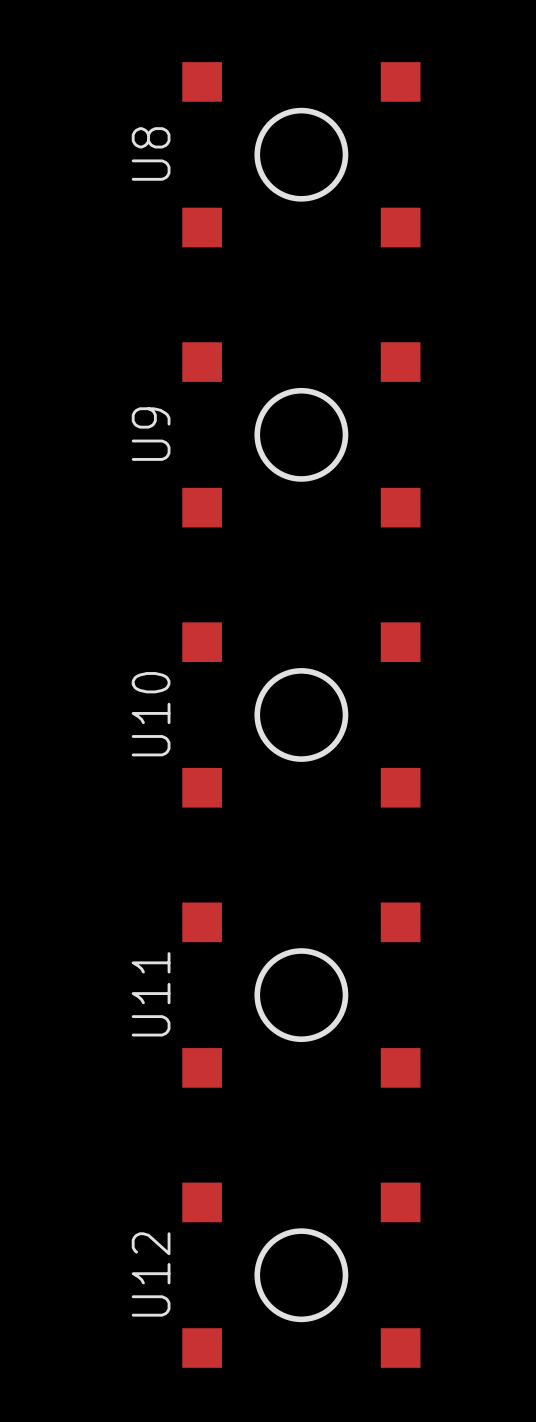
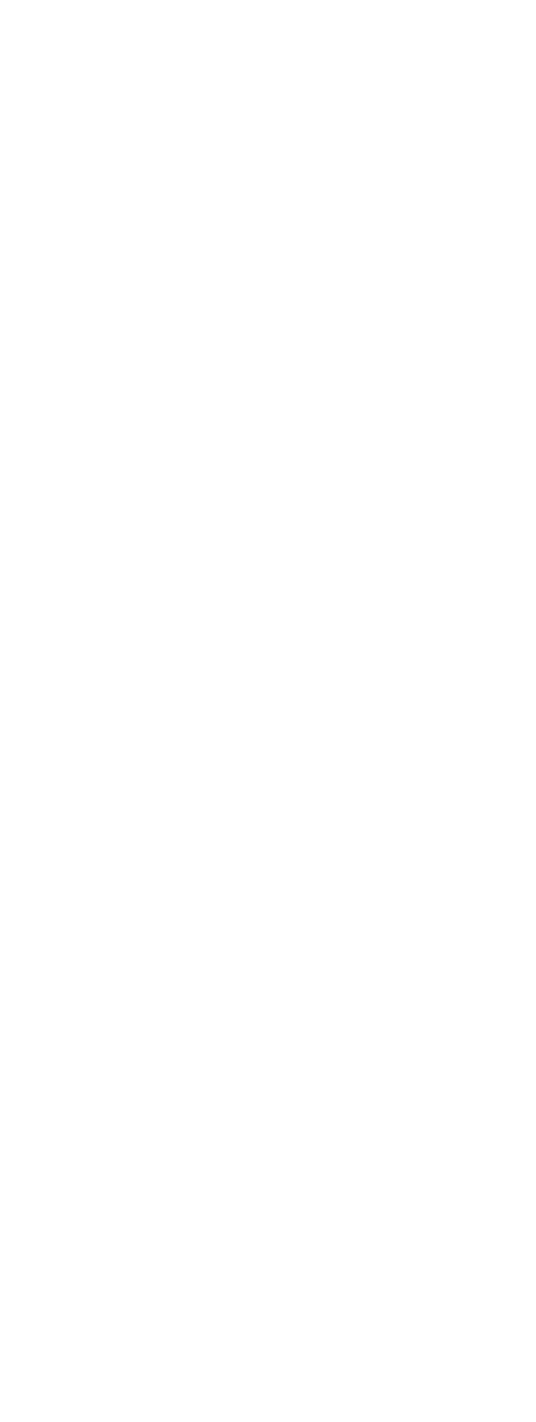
U8: (301, 154) -> none
U9: (301, 434) -> none
U10: (301, 714) -> none
U11: (301, 995) -> none
U12: (301, 1275) -> none

